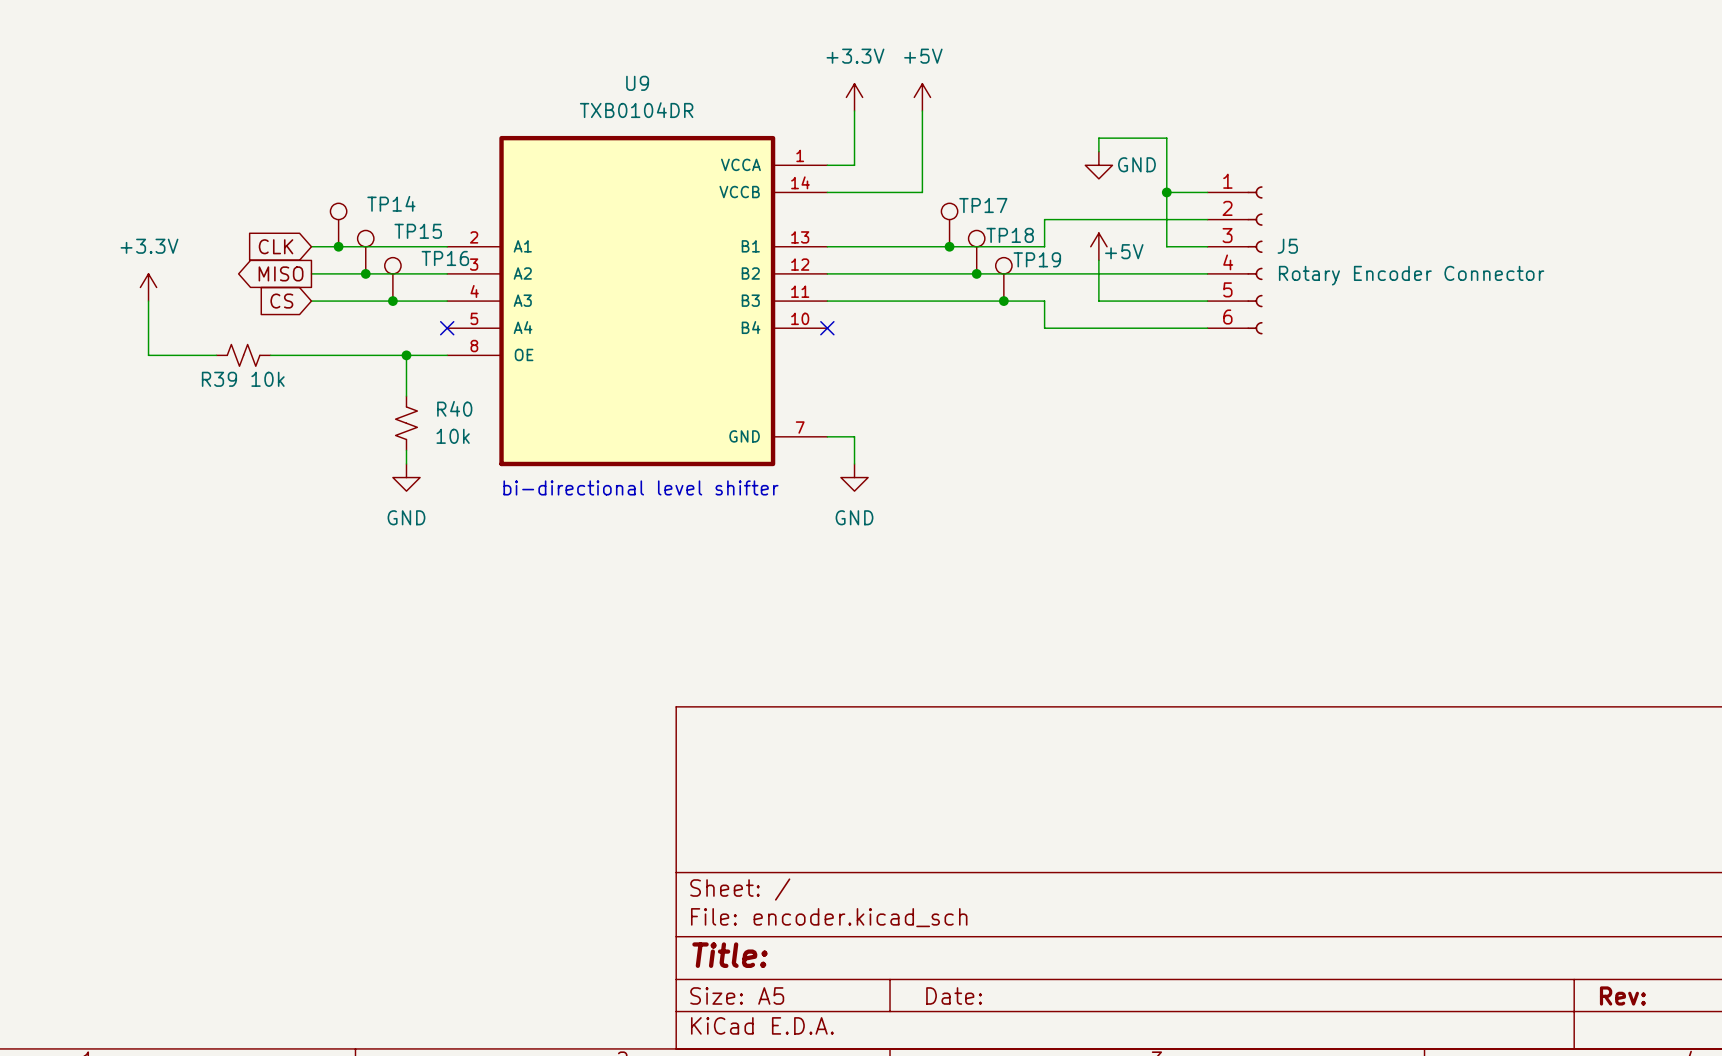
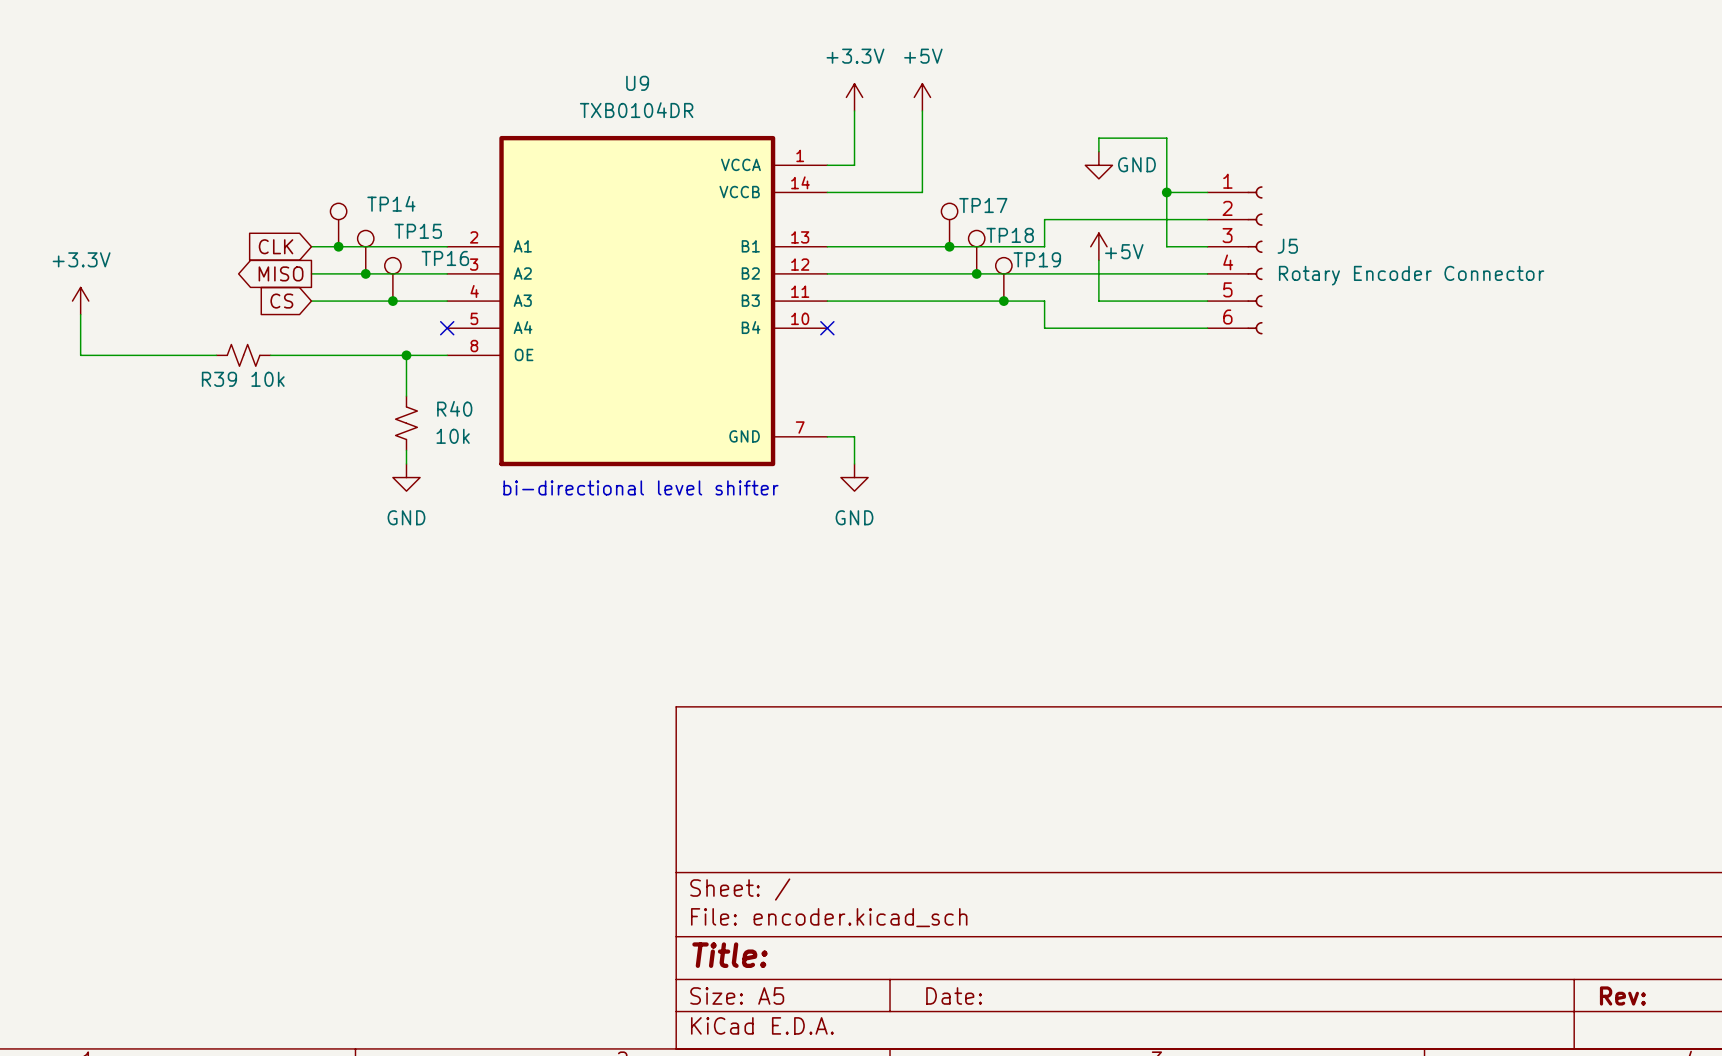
power symbol position: +3.3V (148, 287) -> +3.3V (80, 301)
wire: (148, 301) (148, 355) -> (80, 314) (80, 355) (148, 355)

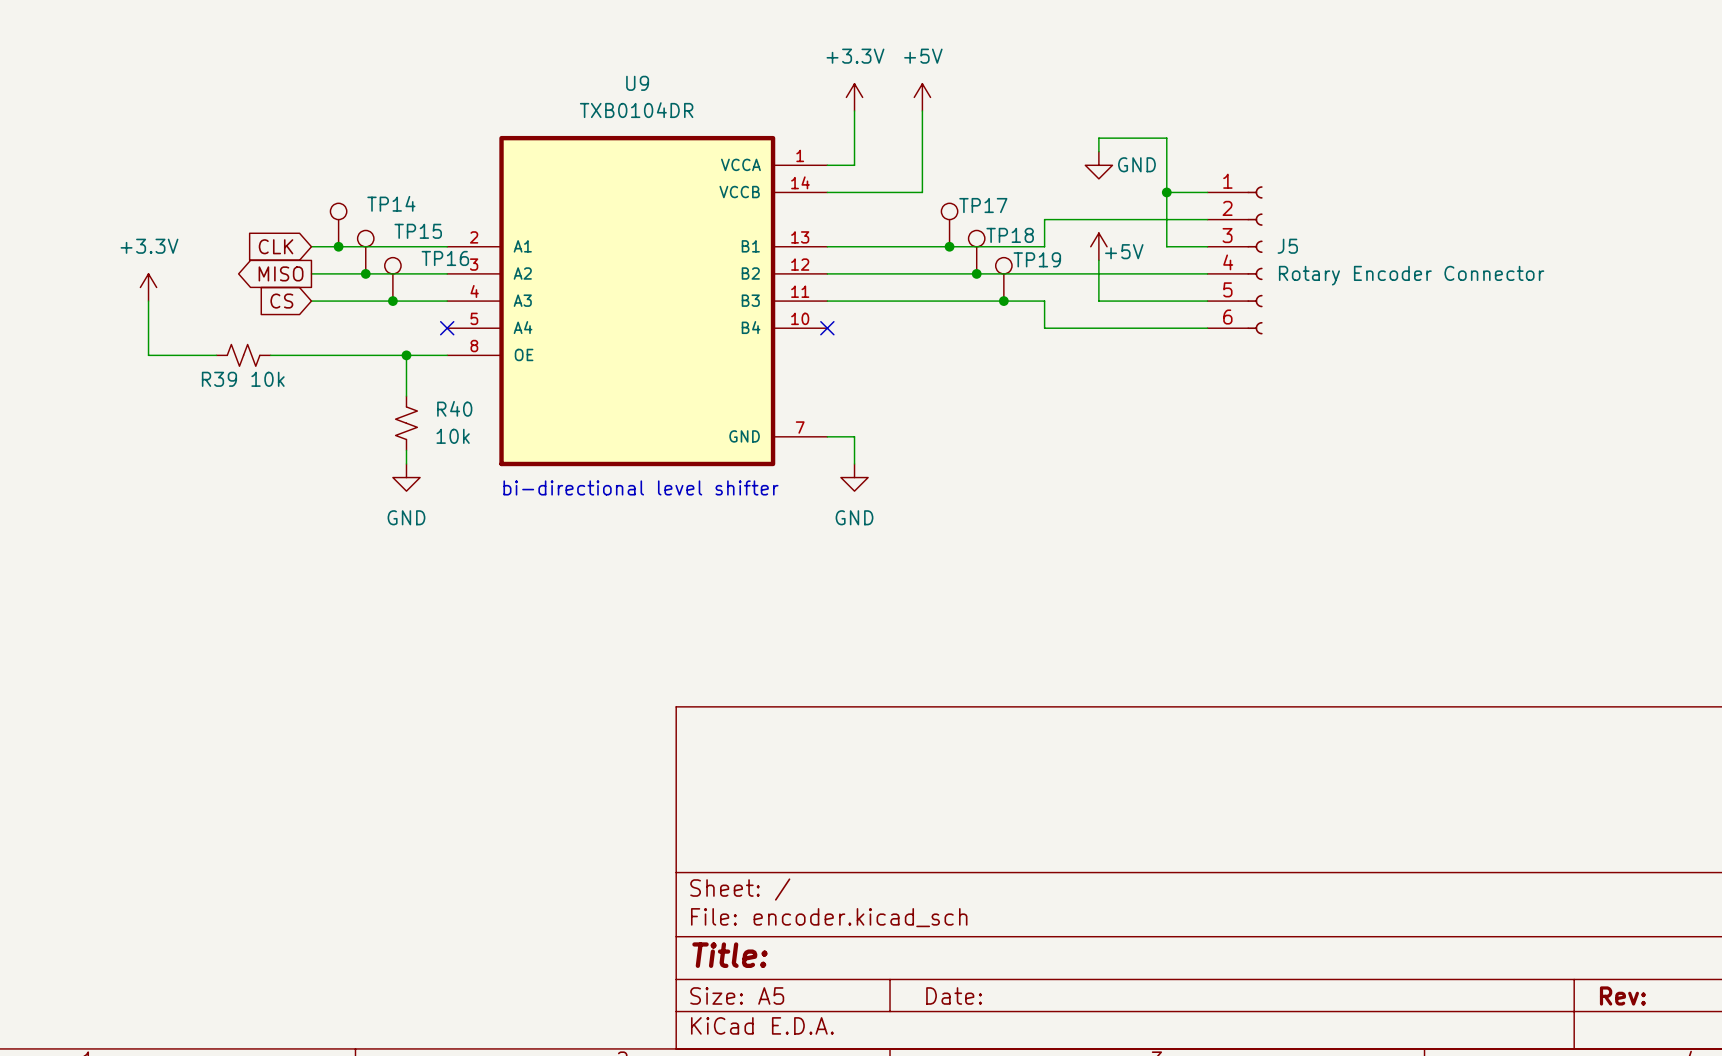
power symbol position: +3.3V (80, 301) -> +3.3V (148, 287)
wire: (80, 314) (80, 355) (148, 355) -> (148, 301) (148, 355)

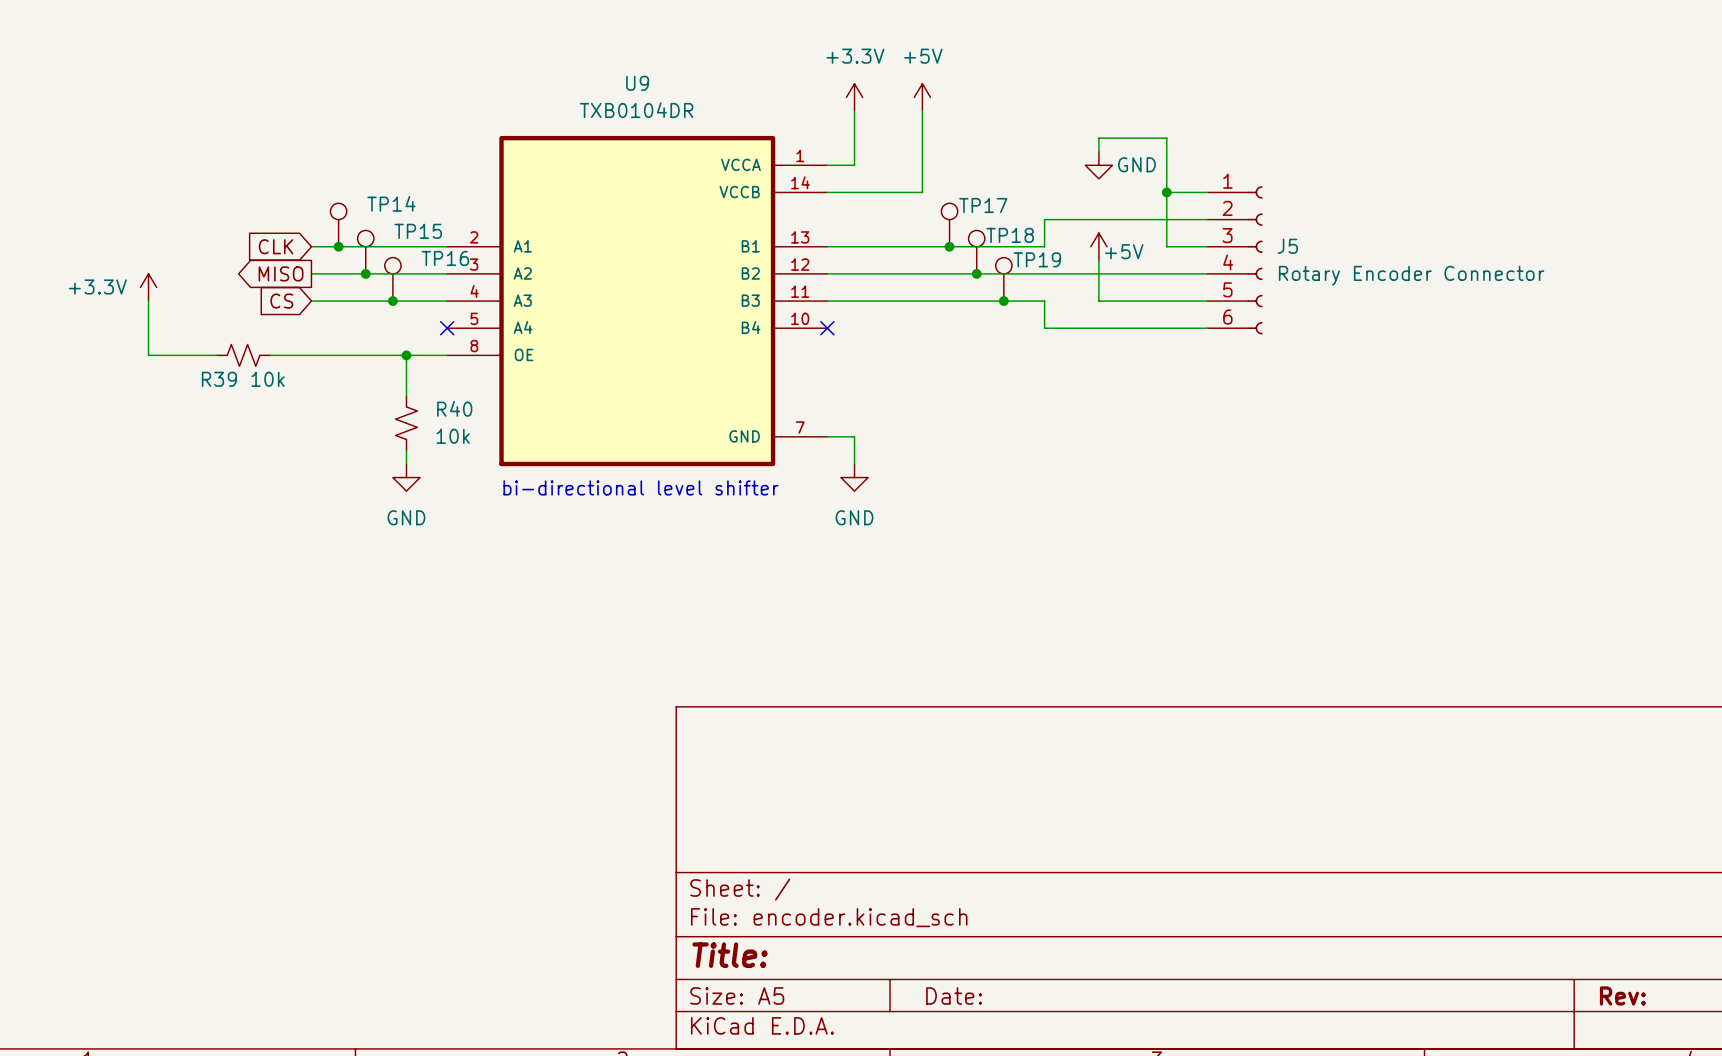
power symbol text position: +3.3V (149, 246) -> +3.3V (97, 286)

